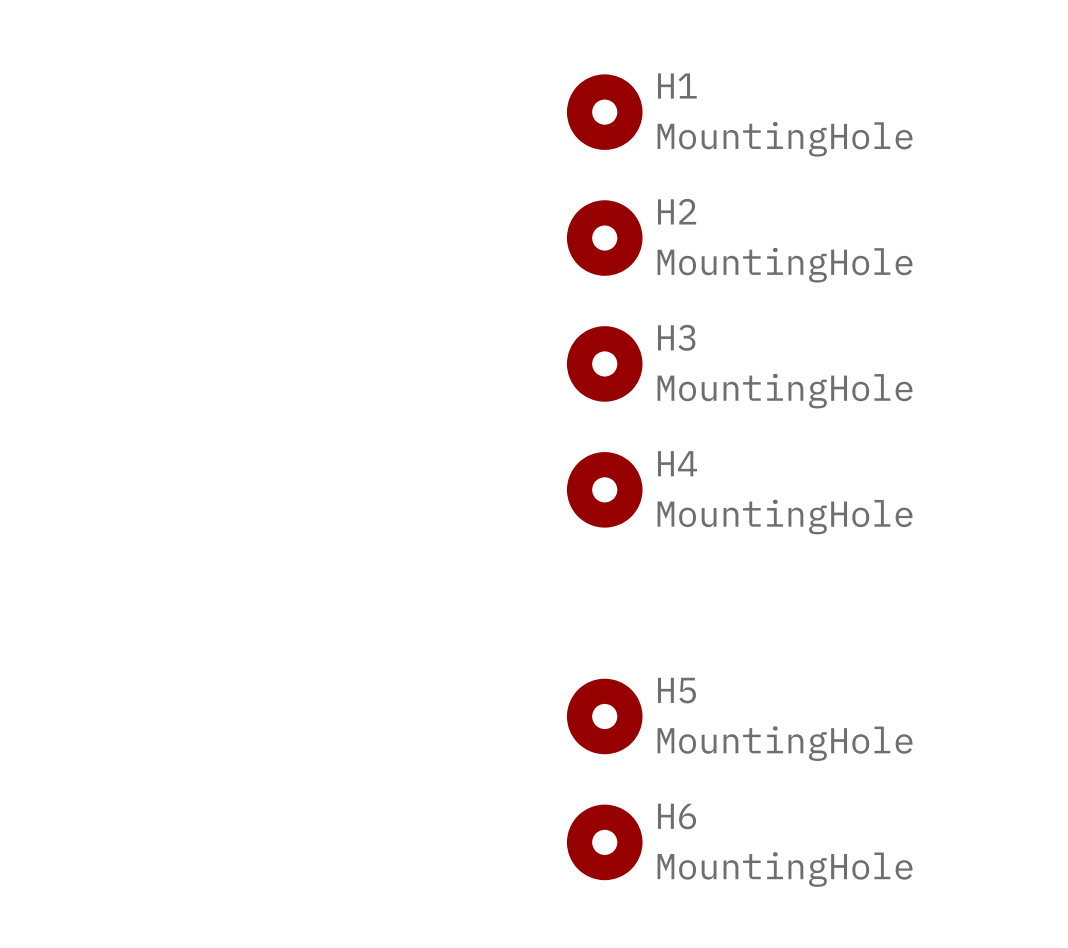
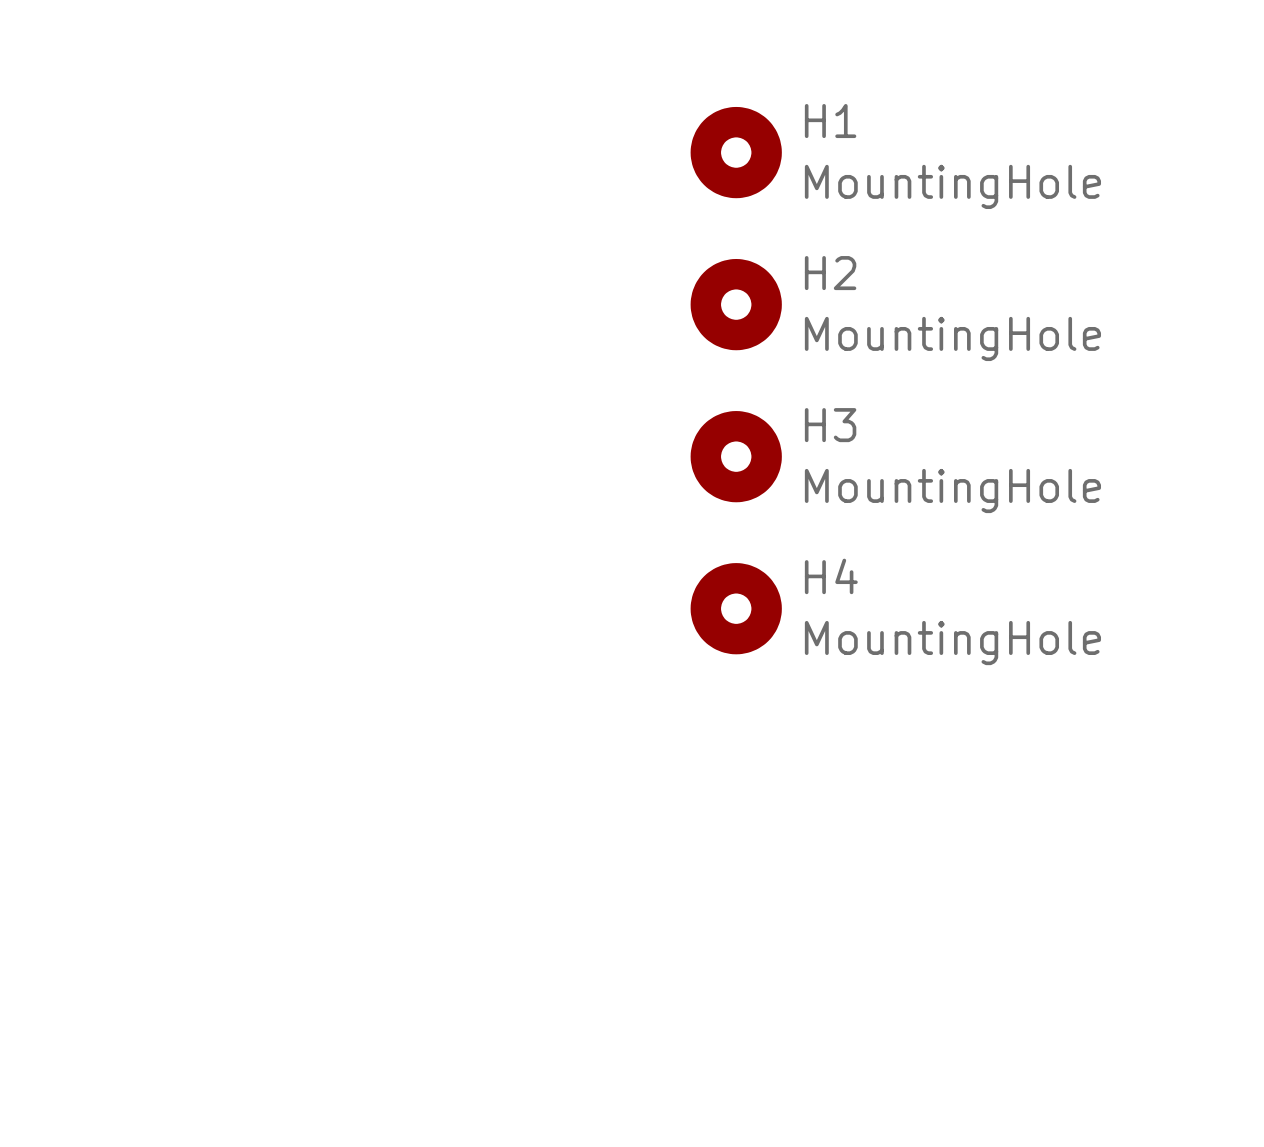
H5: MountingHole (604, 716) -> none
H6: MountingHole (604, 842) -> none

